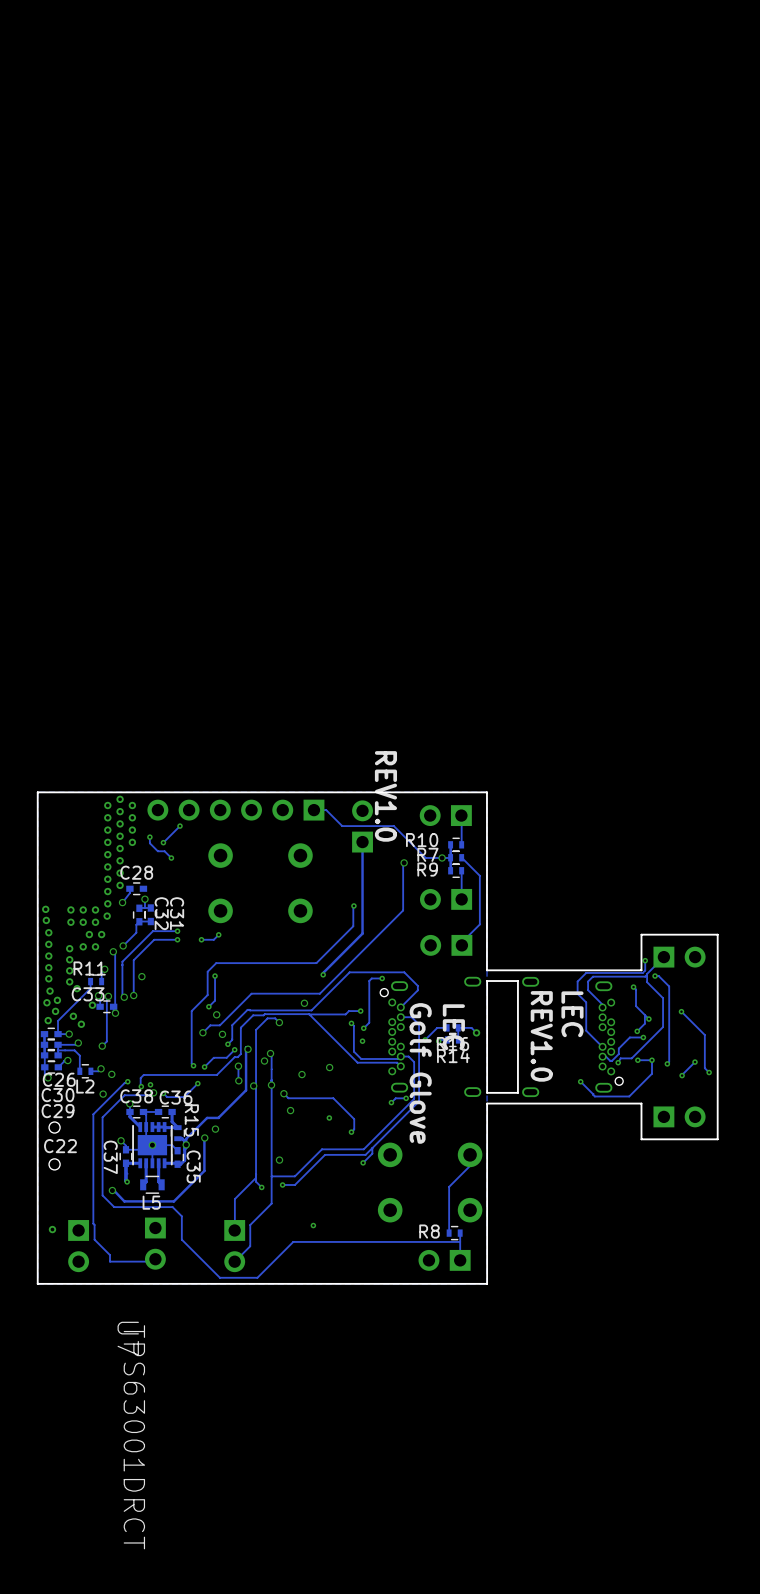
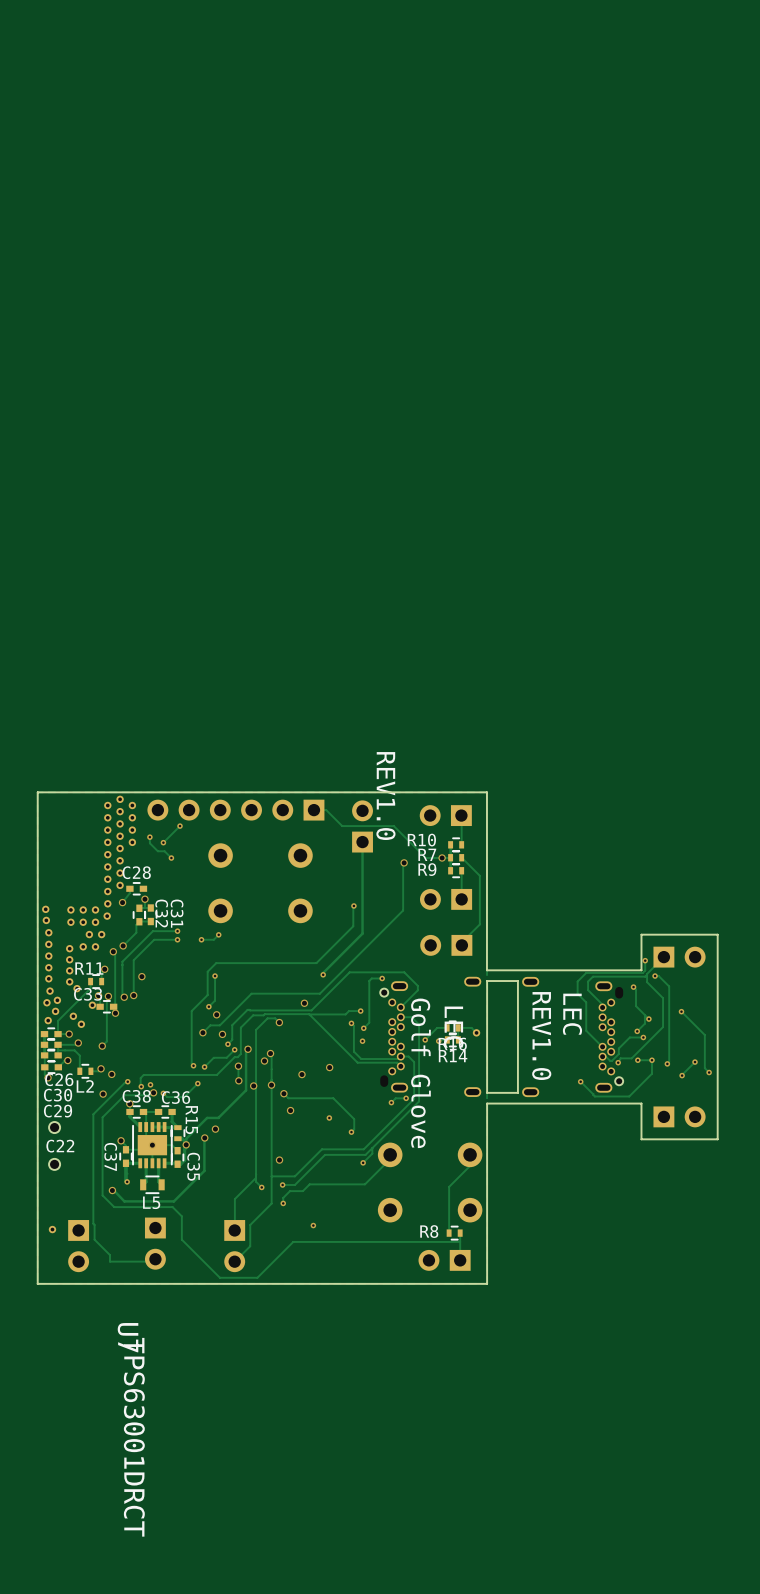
track: none -> (390, 1154) (390, 1159) (364, 1184) (309, 1184) (302, 1191) (290, 1191) (283, 1197) (283, 1203)
via: none -> (283, 1203)

